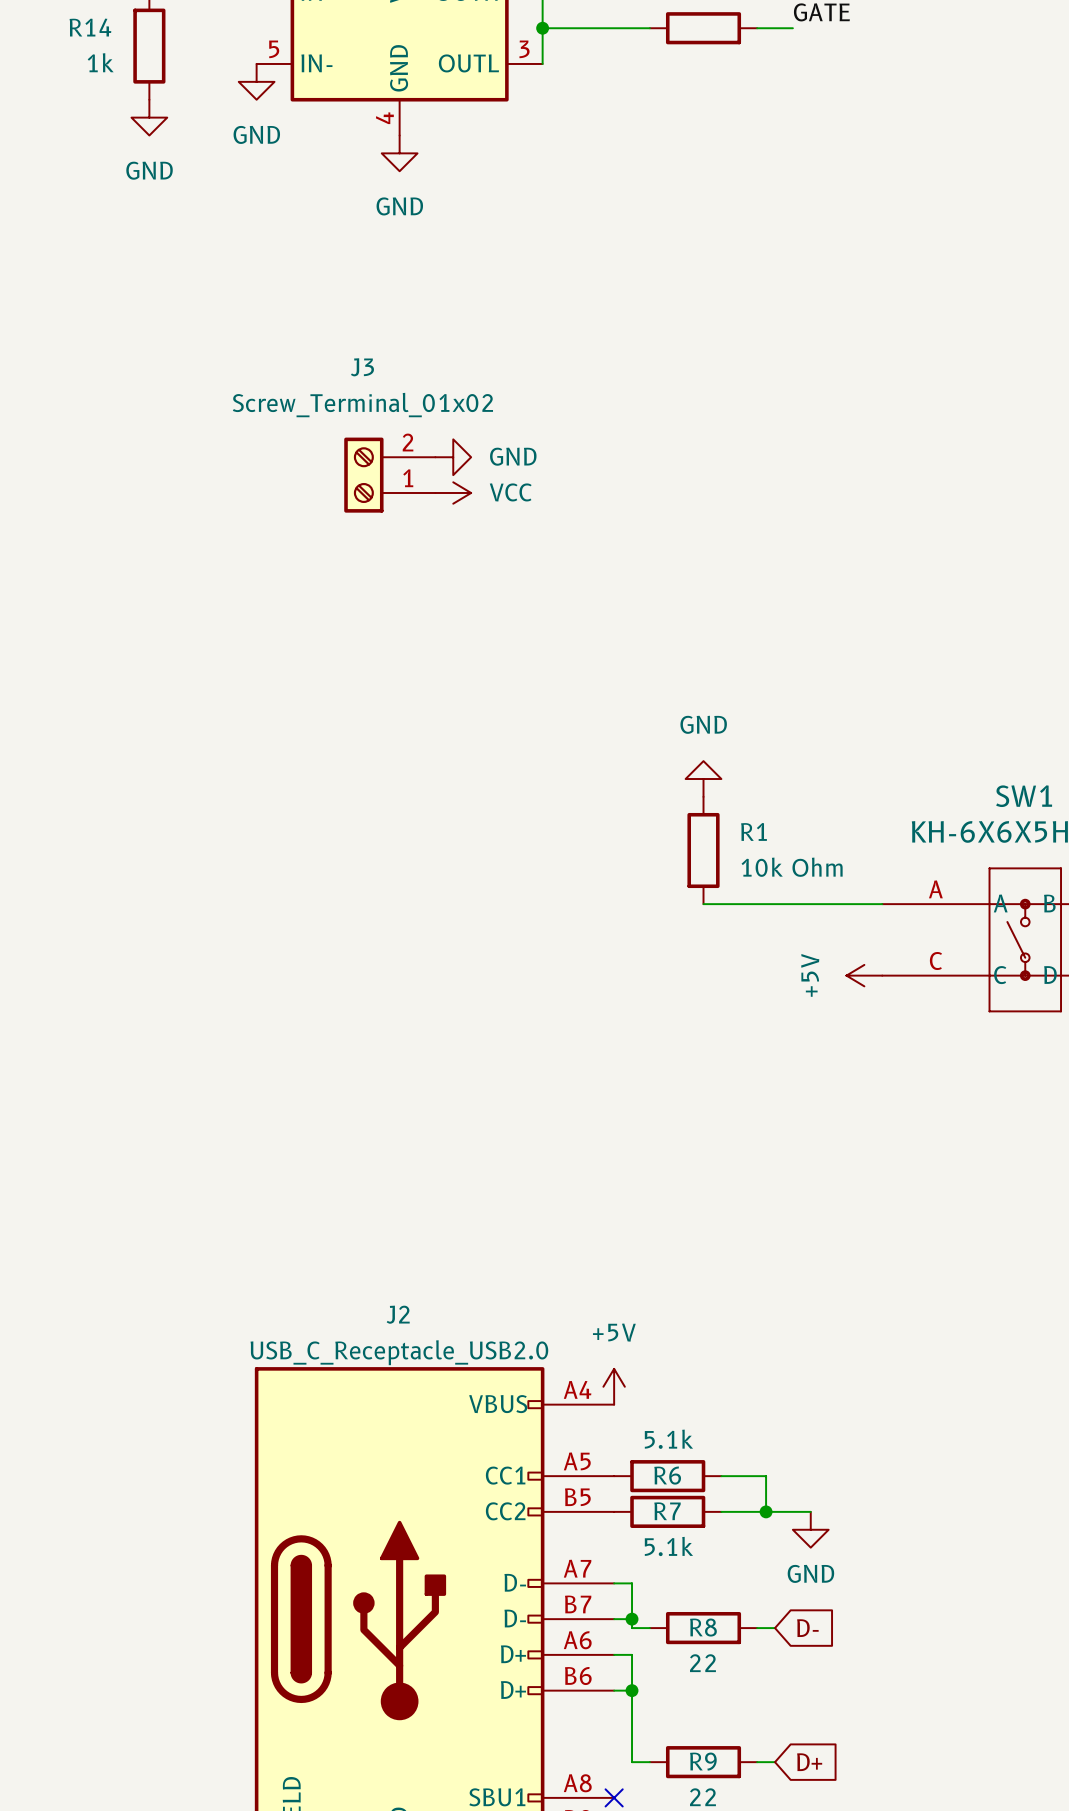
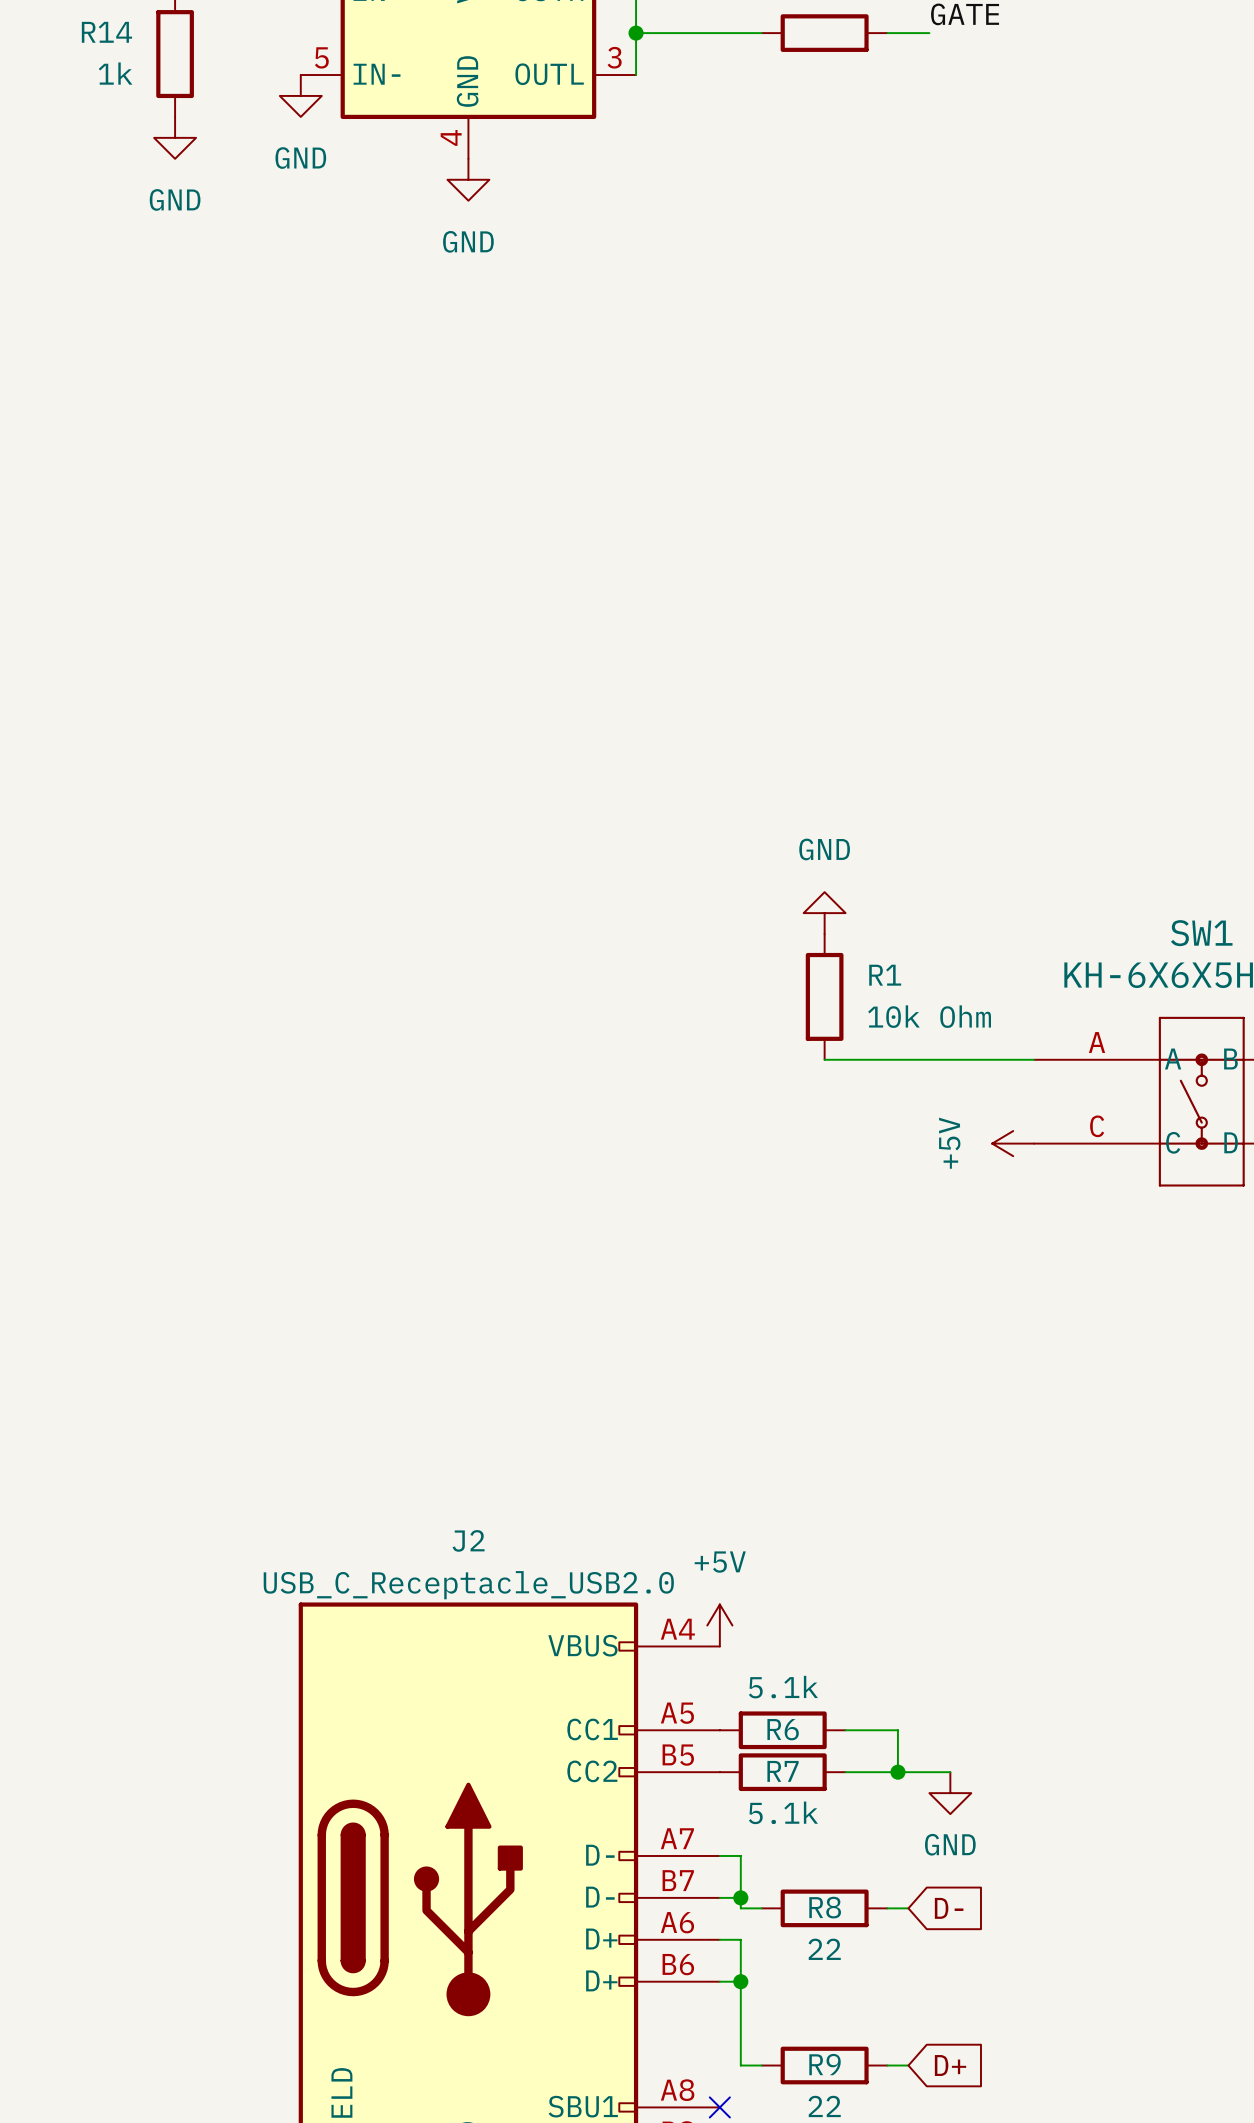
power symbol: GND (453, 457) -> none
J3: Screw_Terminal_01x02 (389, 475) -> none
power symbol: VCC (453, 492) -> none

